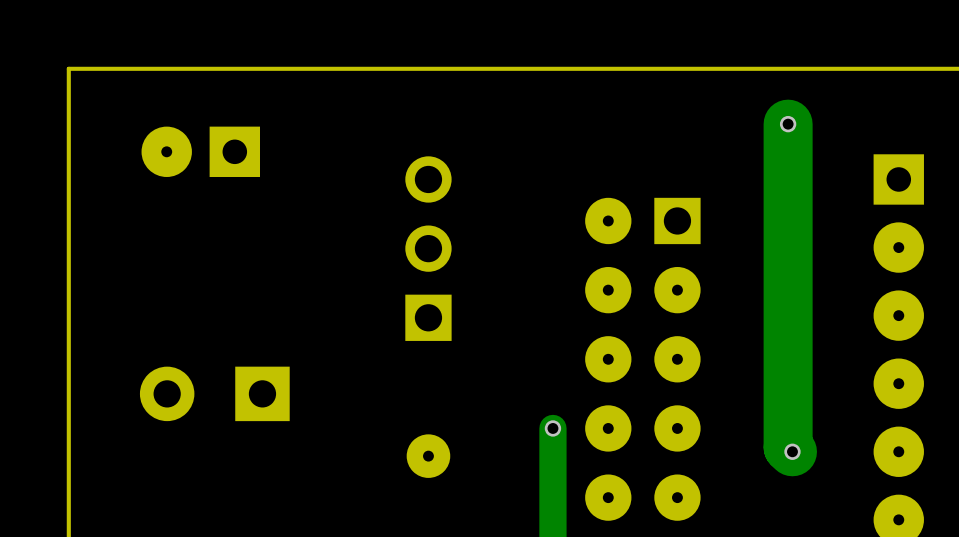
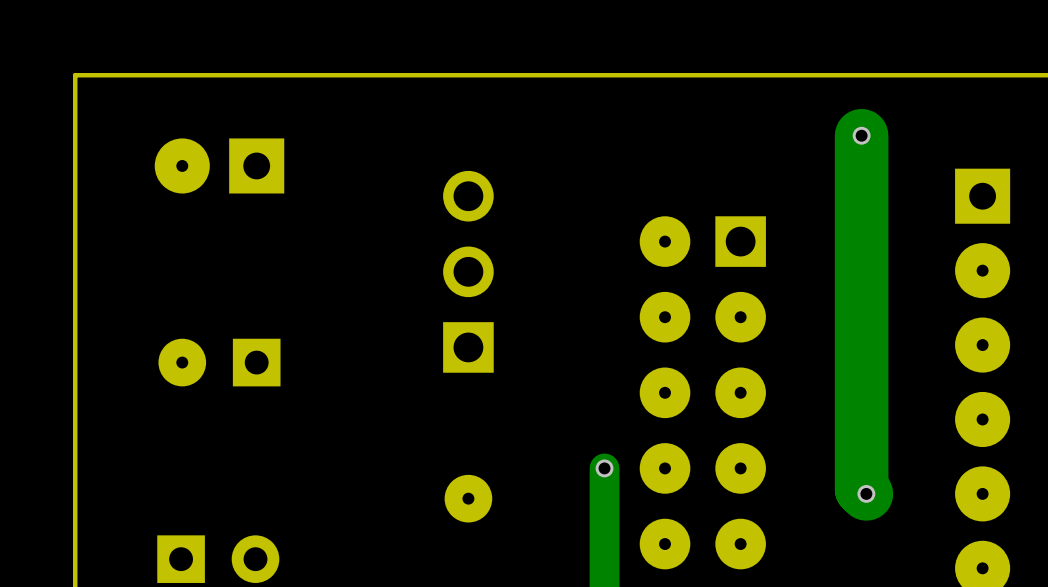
part: none -> (219, 362)
part: (214, 393) -> none
part: none -> (218, 559)

